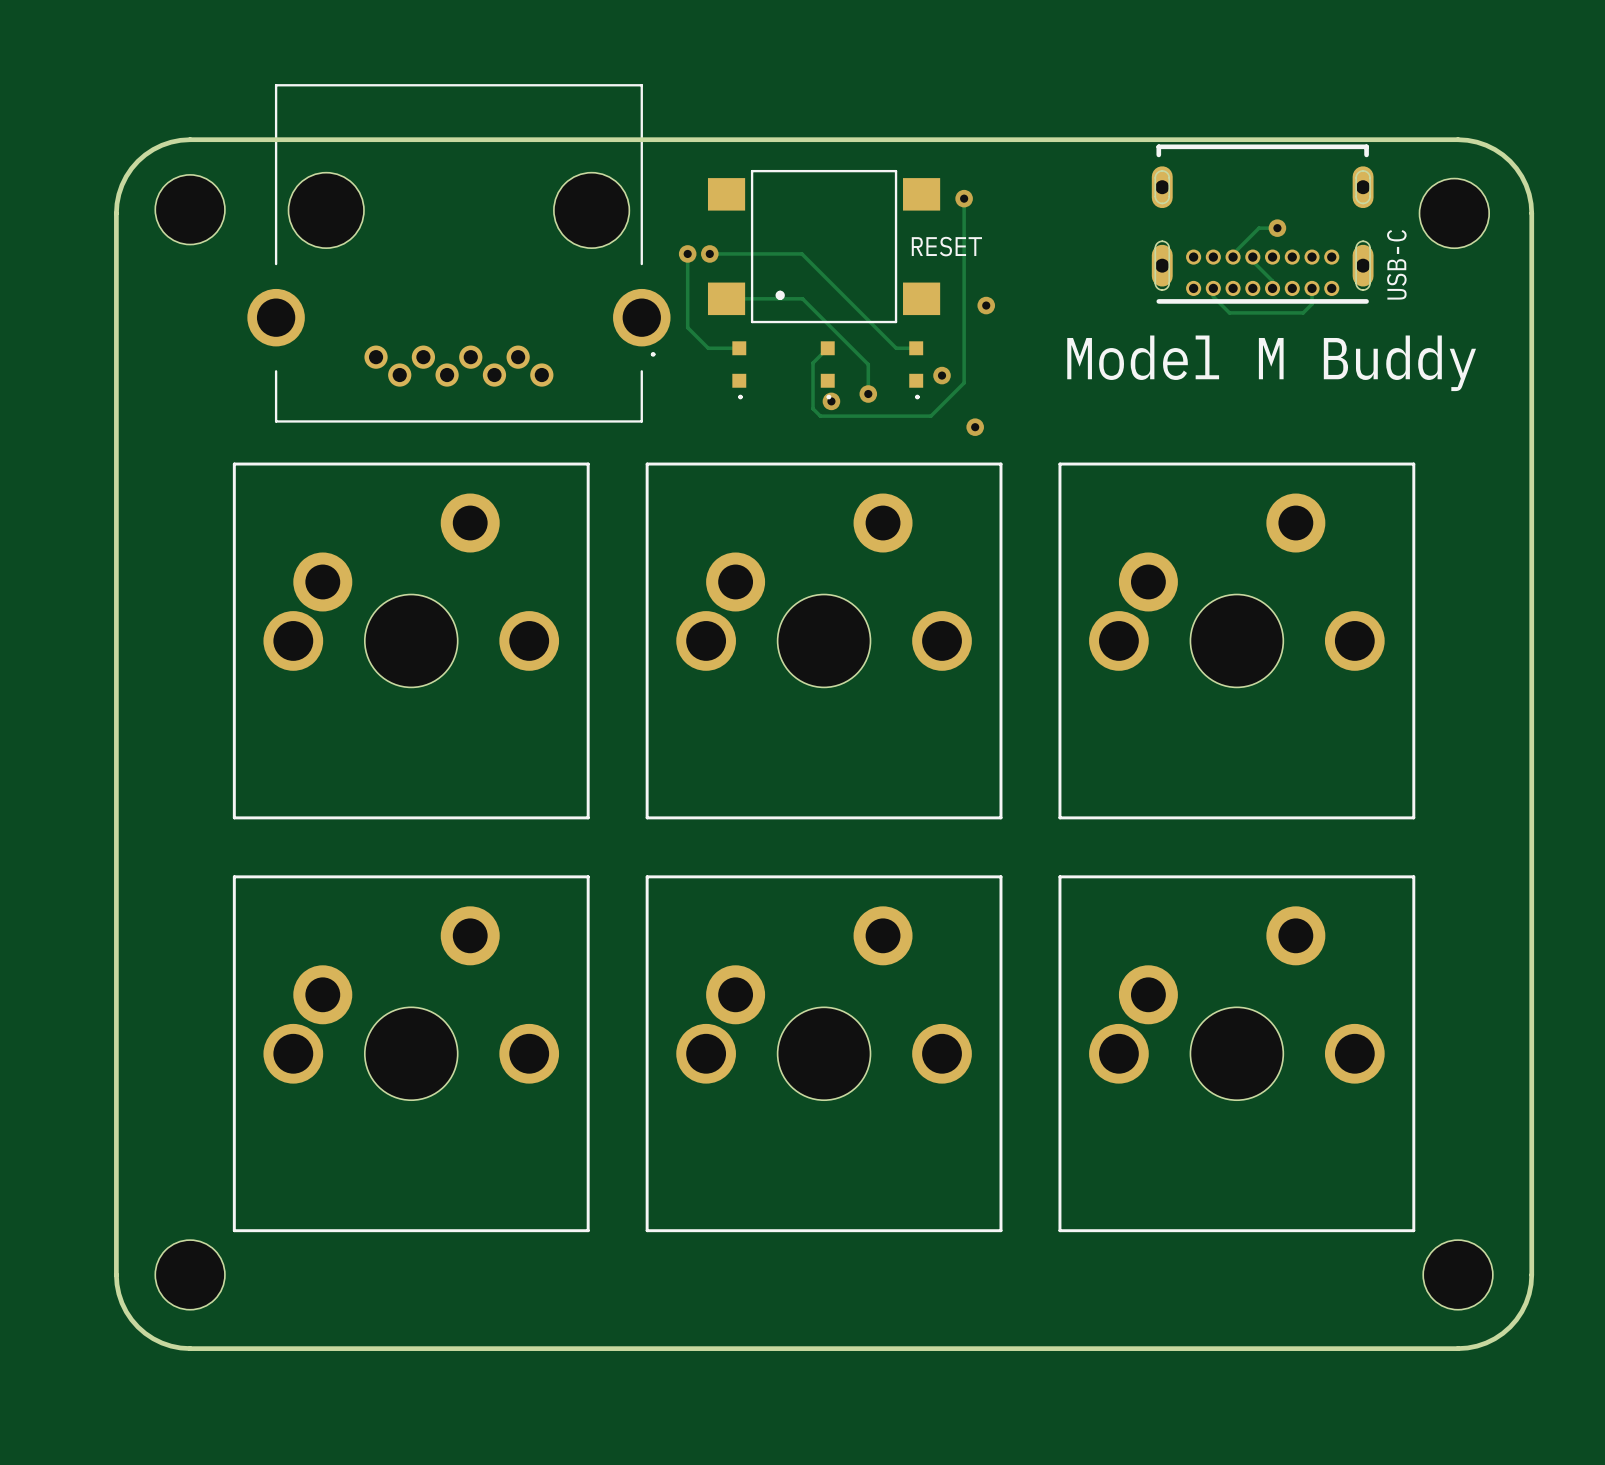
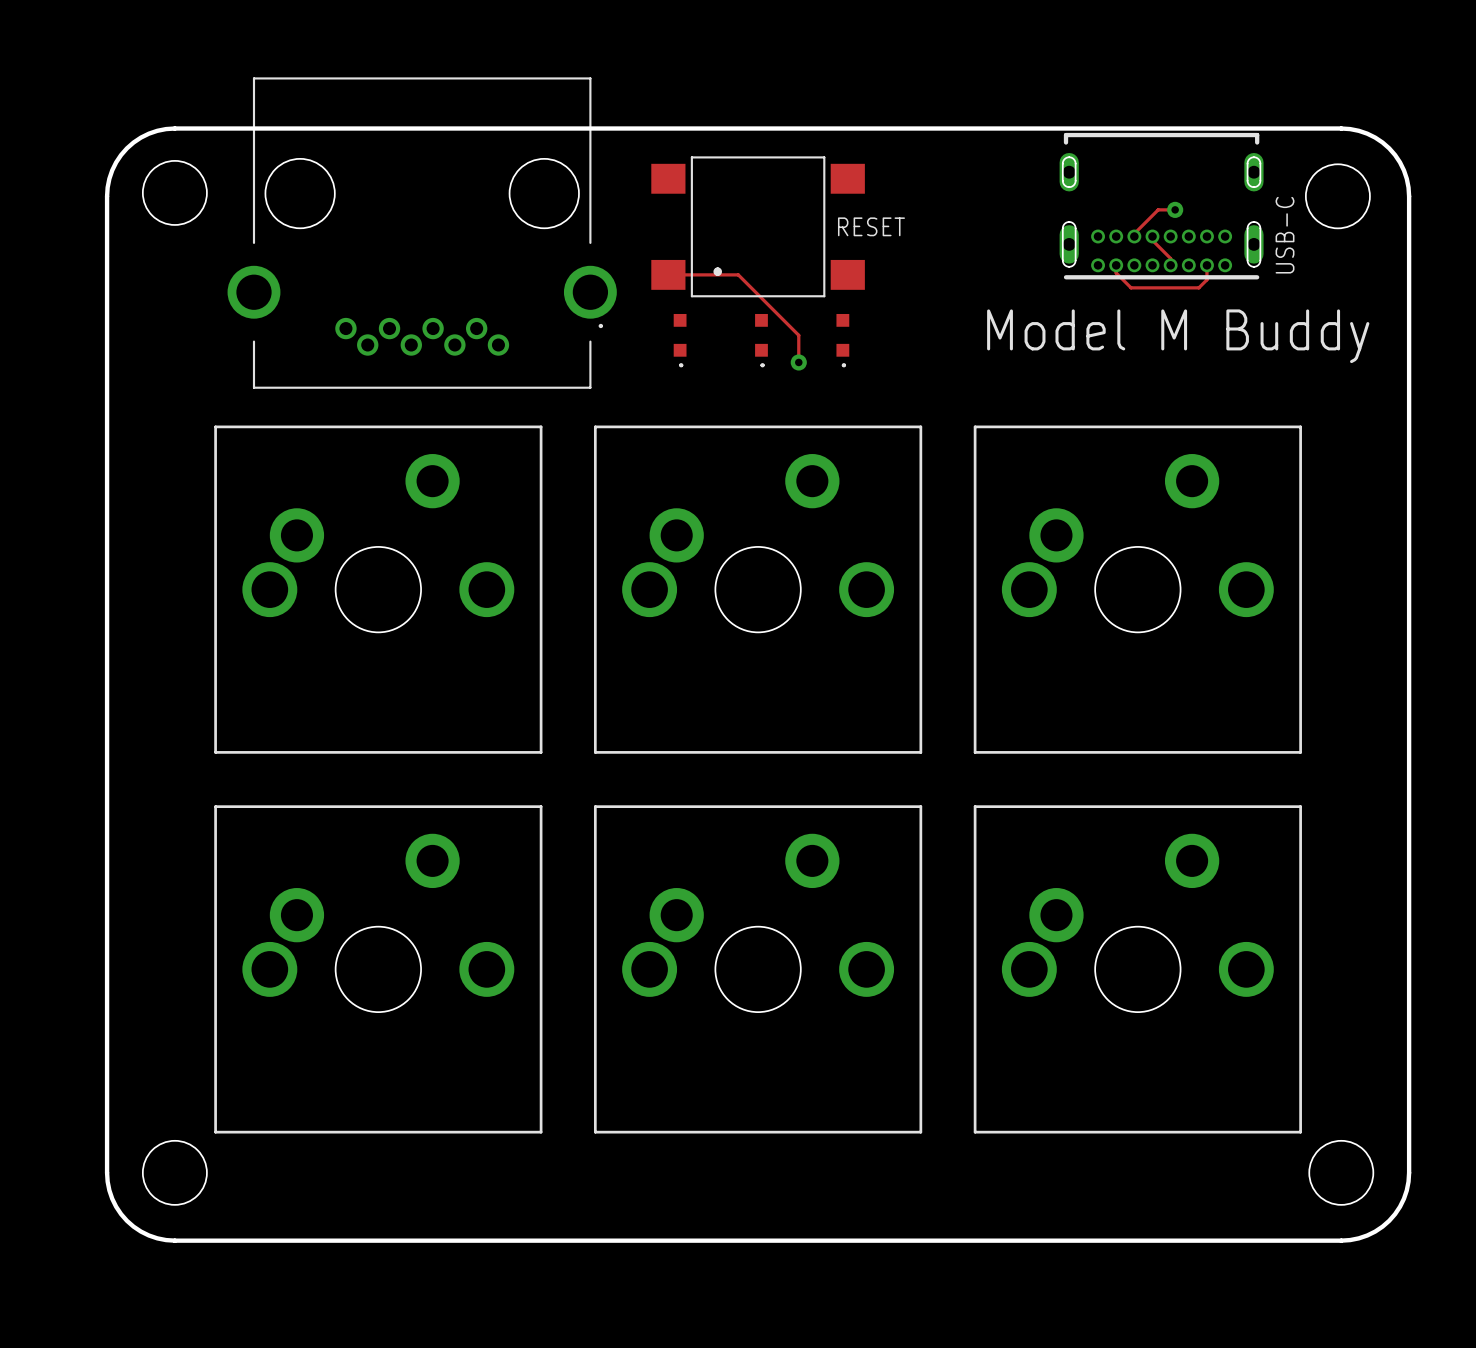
track: (964, 198) (964, 382) (930, 416) (820, 416) (813, 408) (813, 363) (827, 348) -> none
via: (964, 198) -> none
track: (687, 253) (687, 327) (708, 348) (739, 348) -> none
via: (687, 253) -> none
track: (709, 253) (801, 253) (896, 348) (916, 348) -> none
via: (709, 253) -> none
via: (986, 305) -> none
via: (942, 375) -> none
via: (831, 401) -> none
via: (975, 427) -> none

